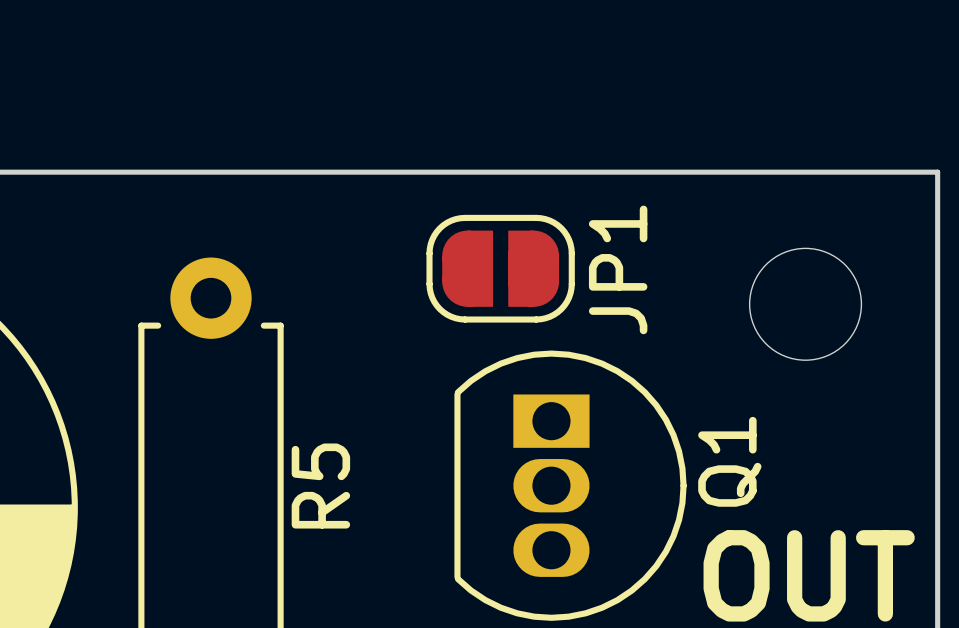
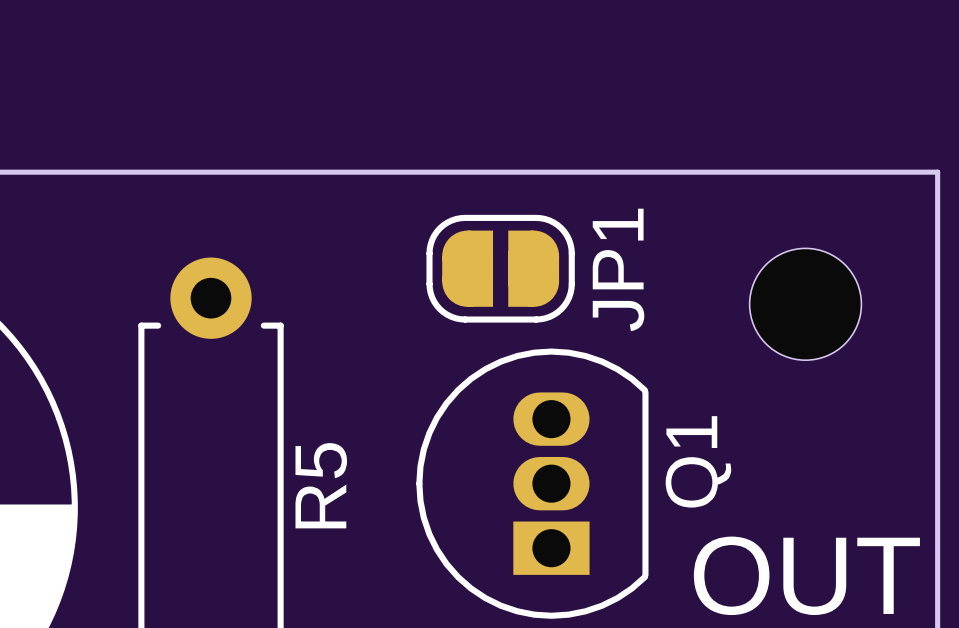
Q1 rotation: 0° (570, 485) -> 180° (532, 483)

